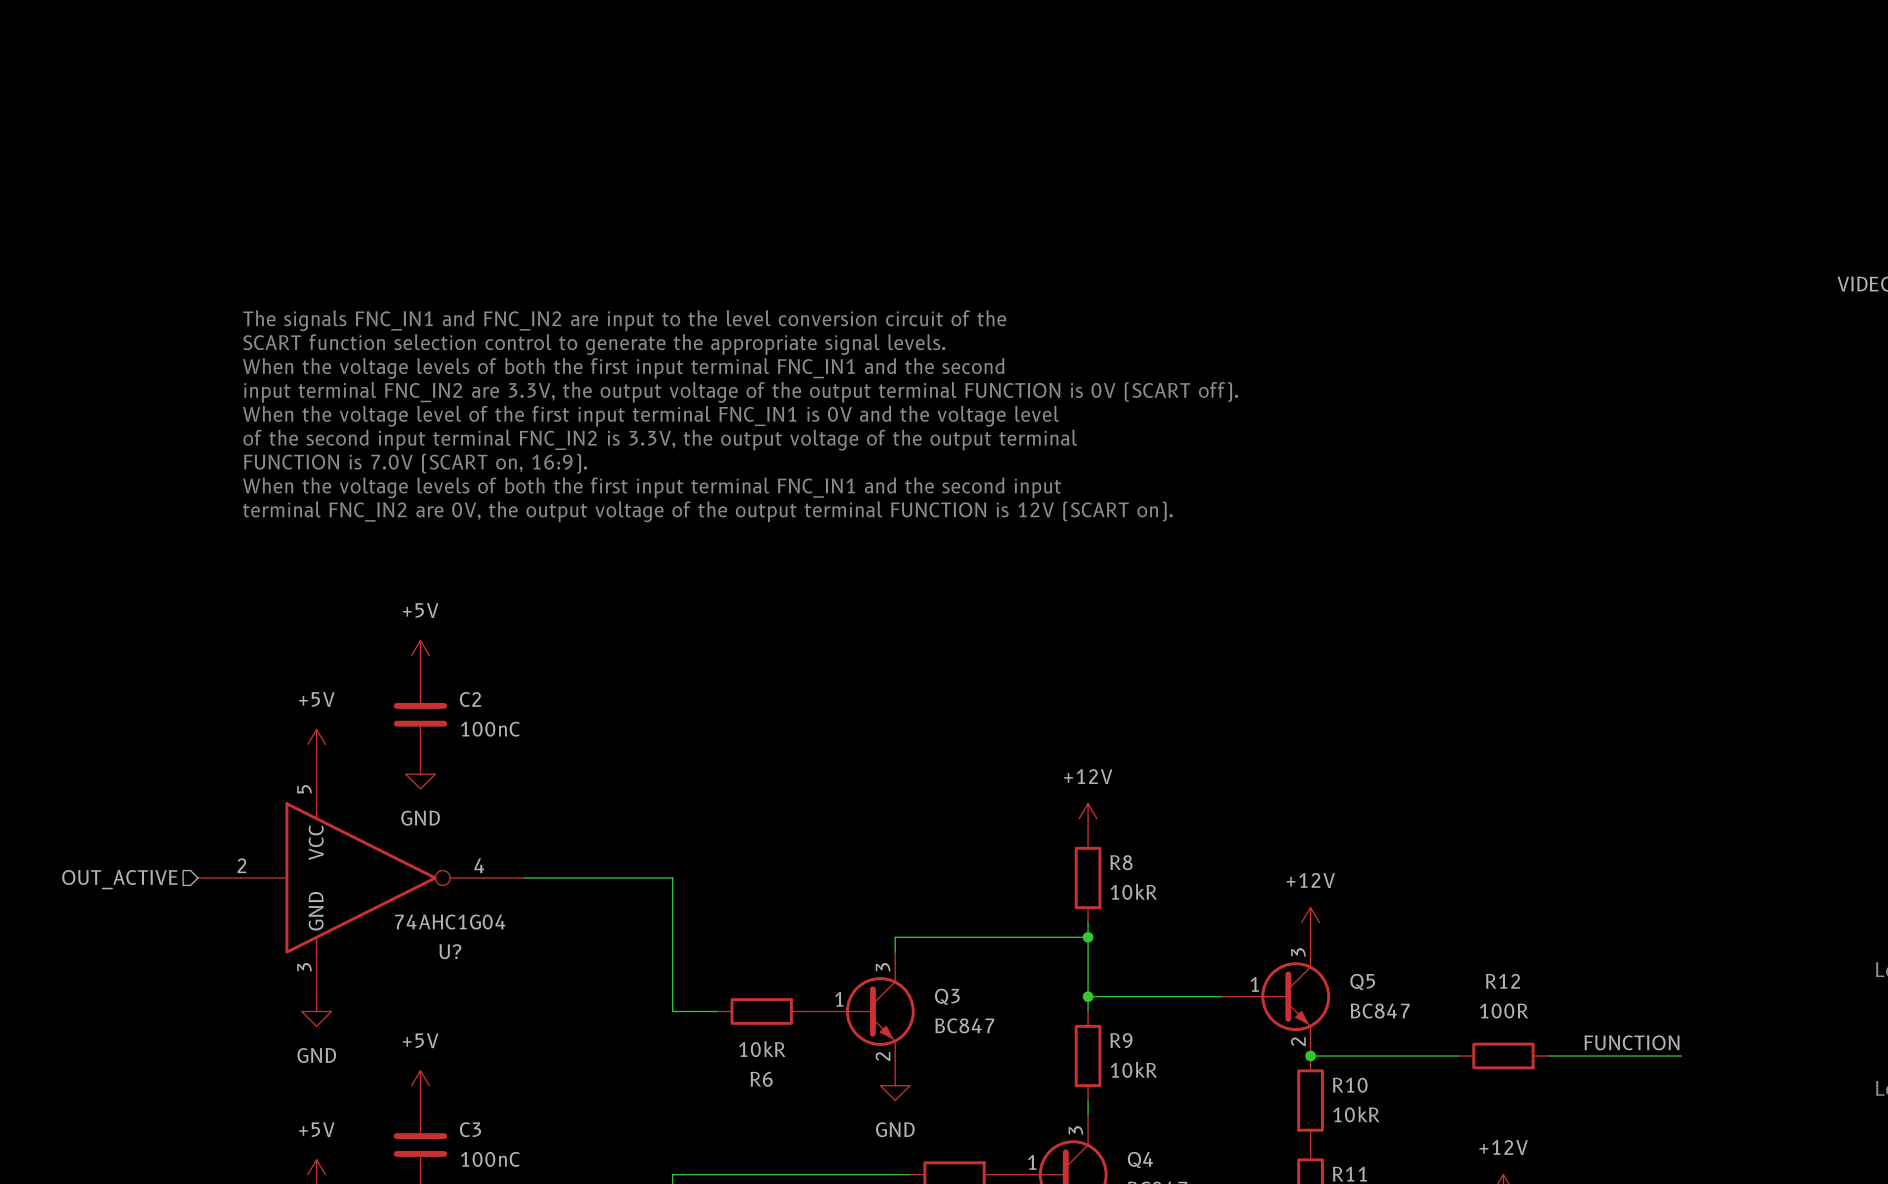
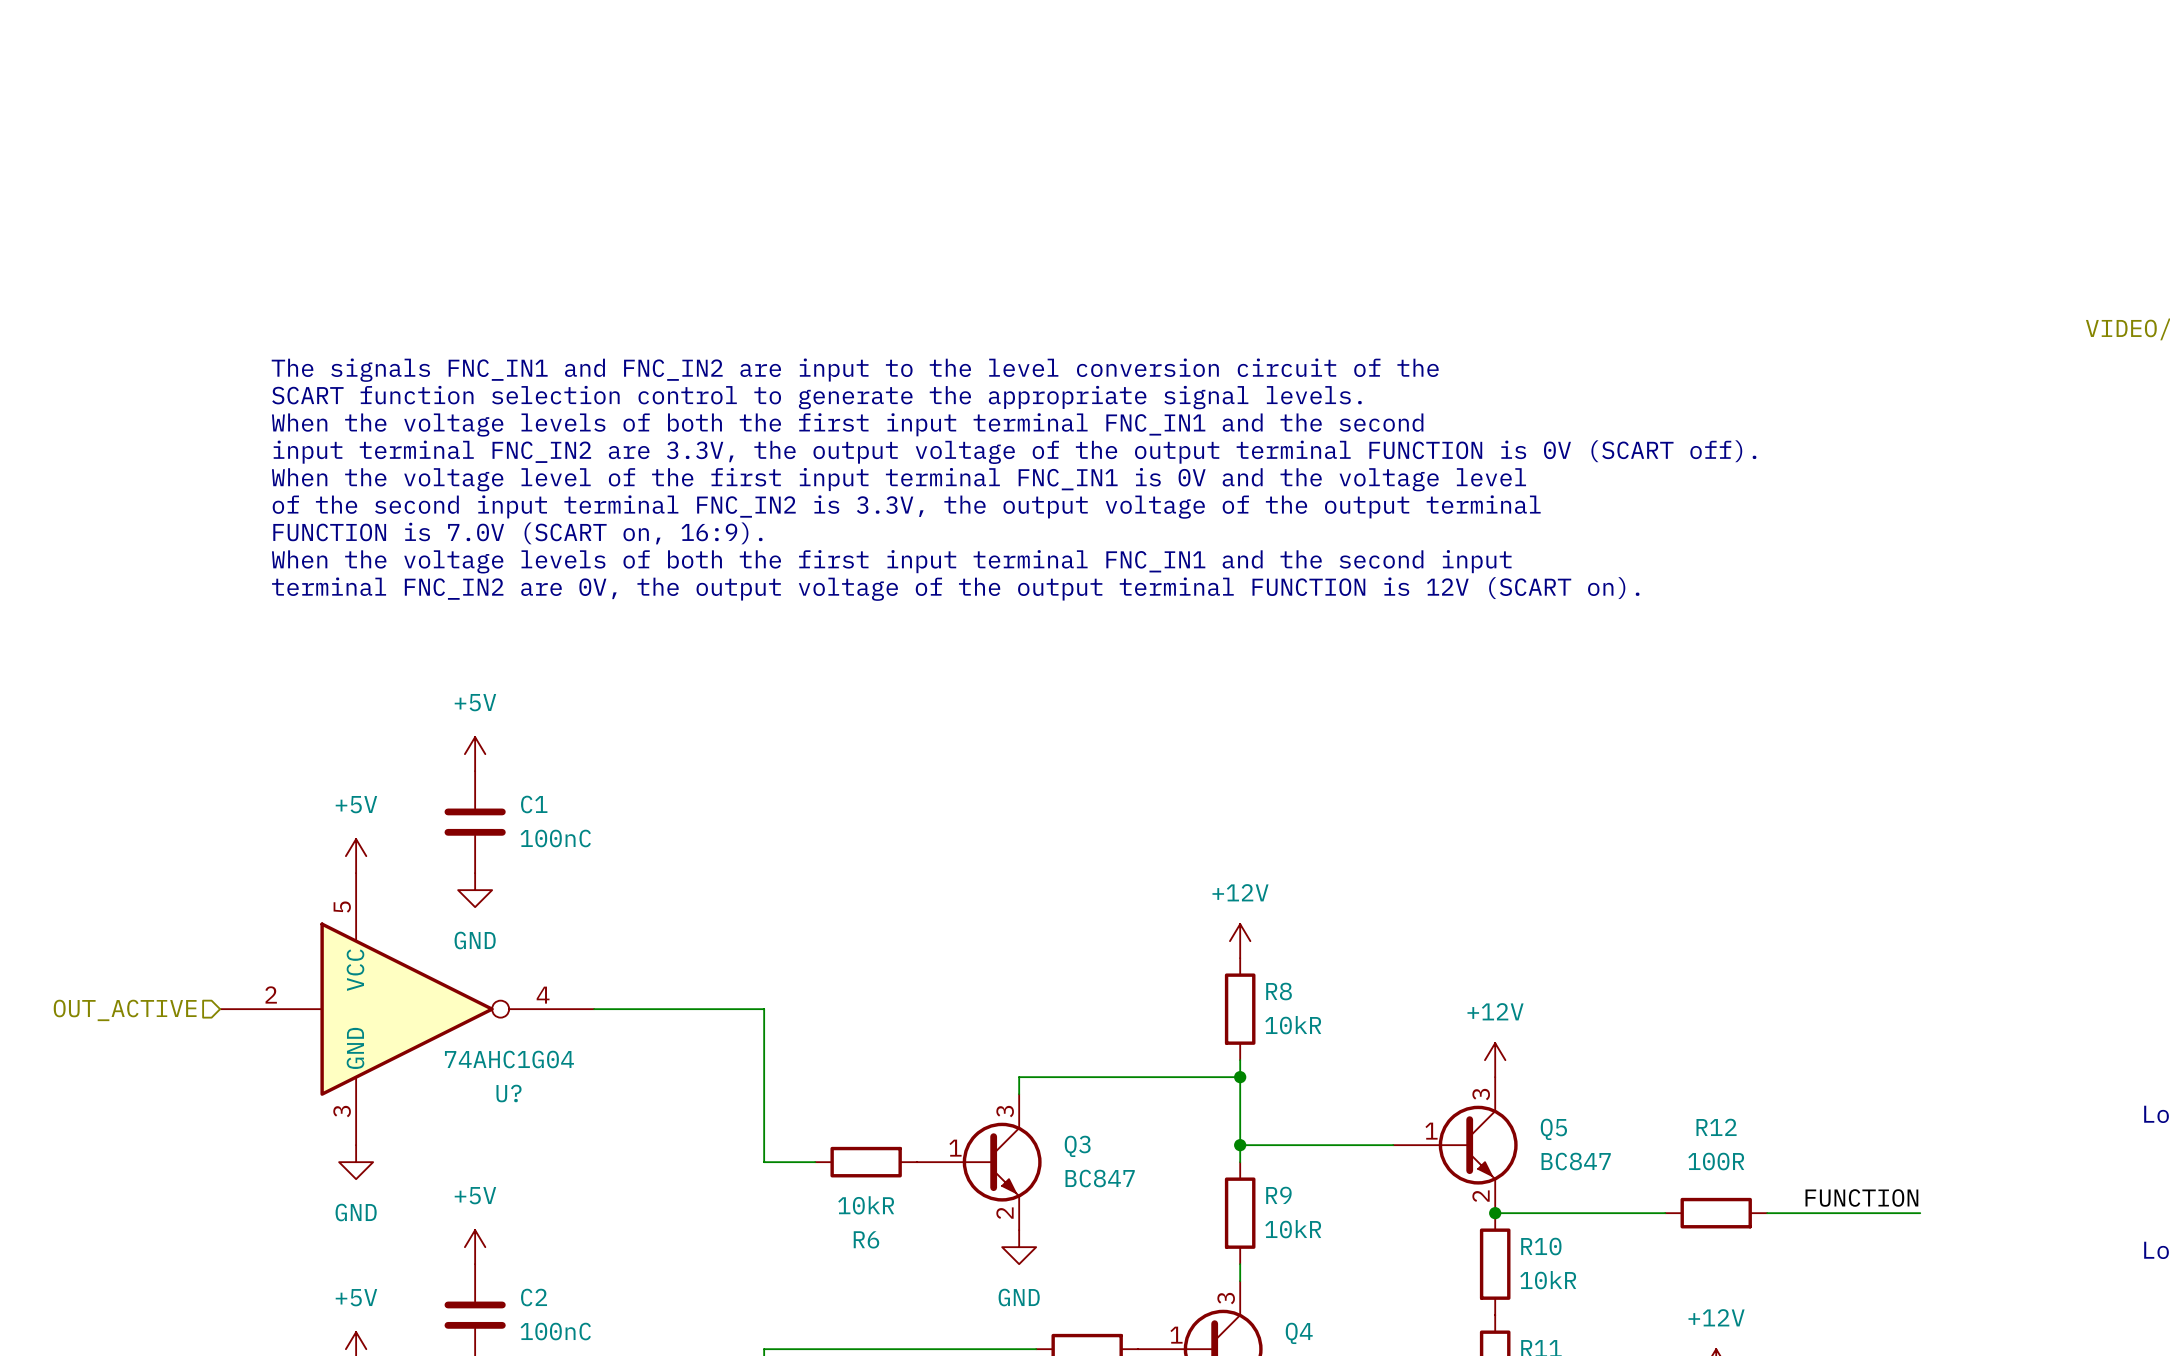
C2 name: C2 (470, 699) -> C1 (534, 804)
C3 name: C3 (470, 1129) -> C2 (534, 1297)

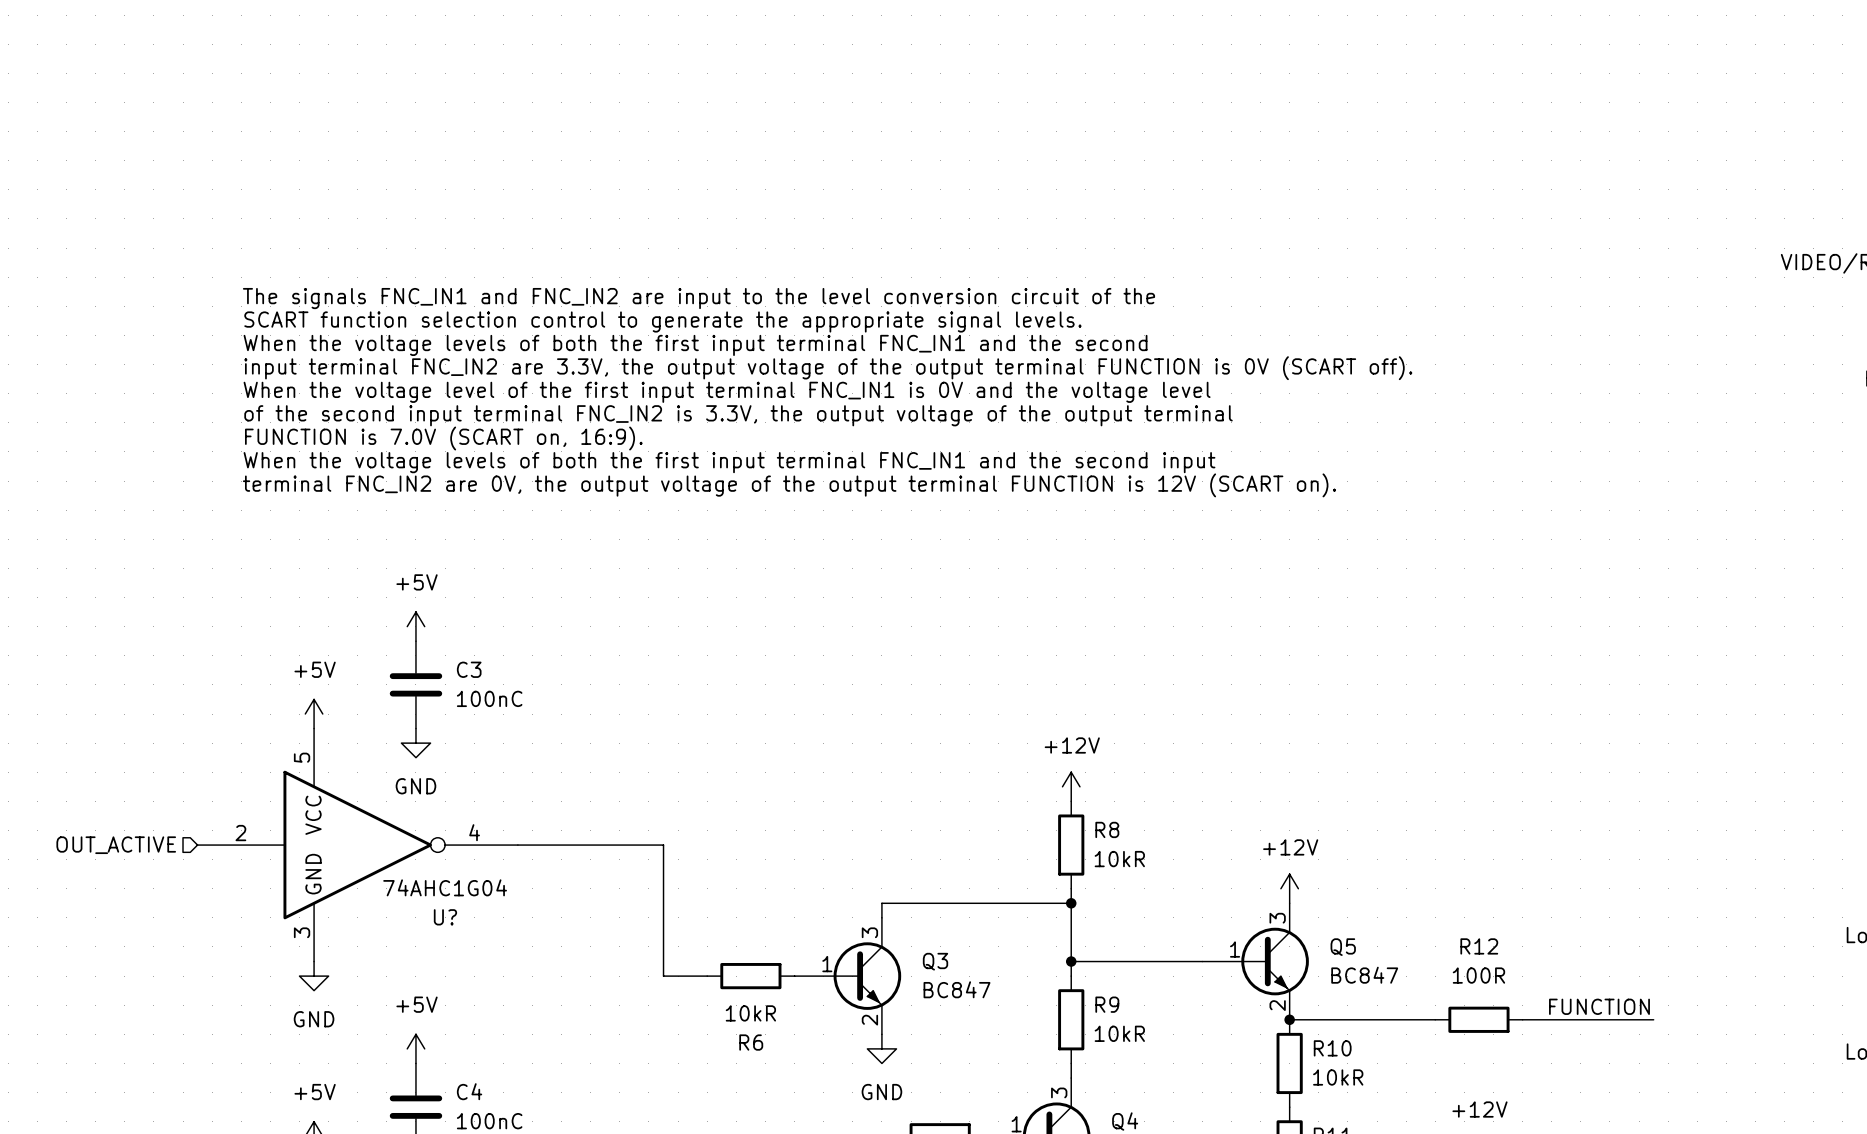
C1 name: C1 (534, 804) -> C3 (469, 669)
C2 name: C2 (534, 1297) -> C4 (469, 1091)

